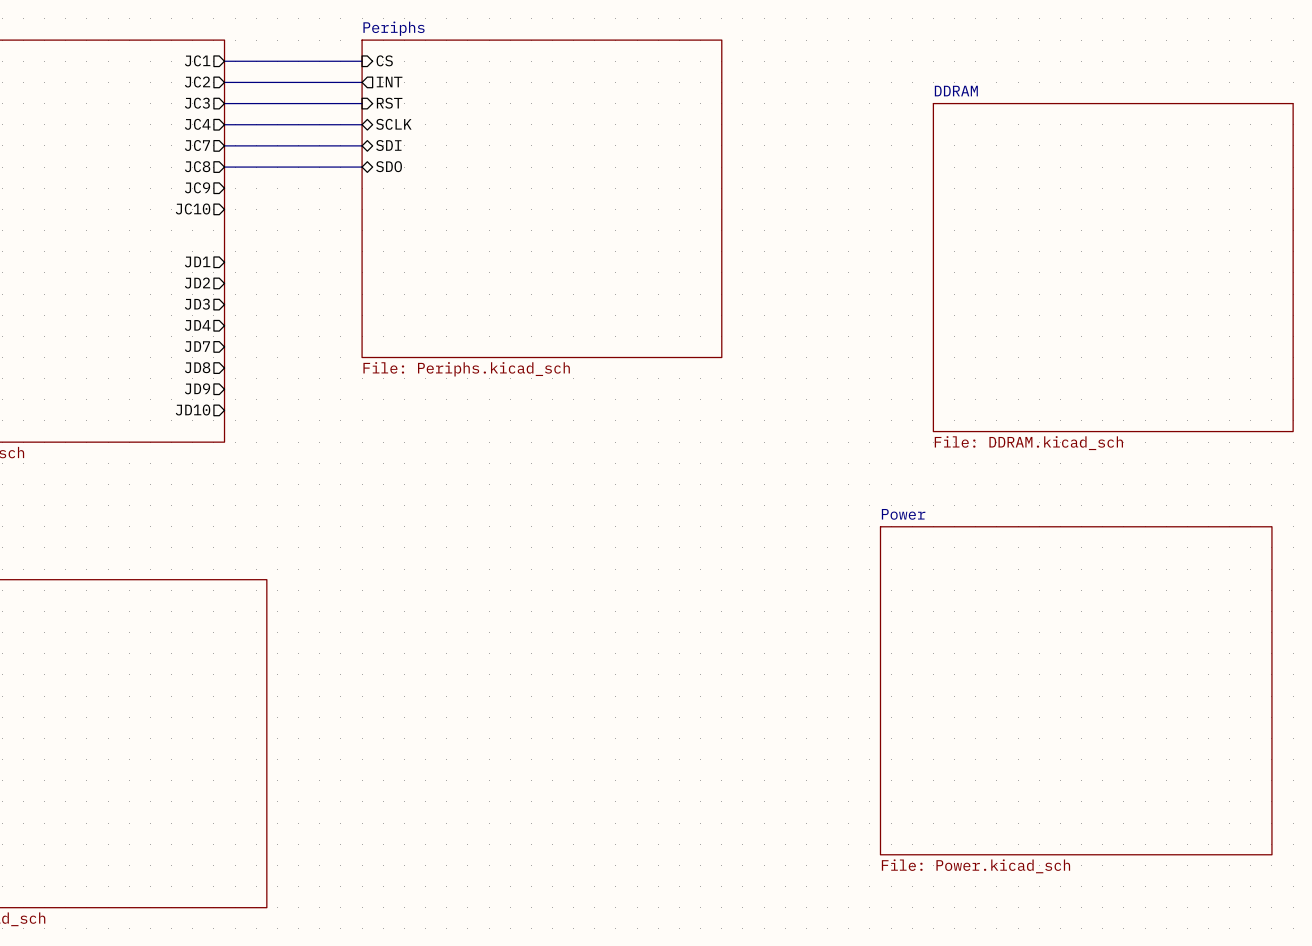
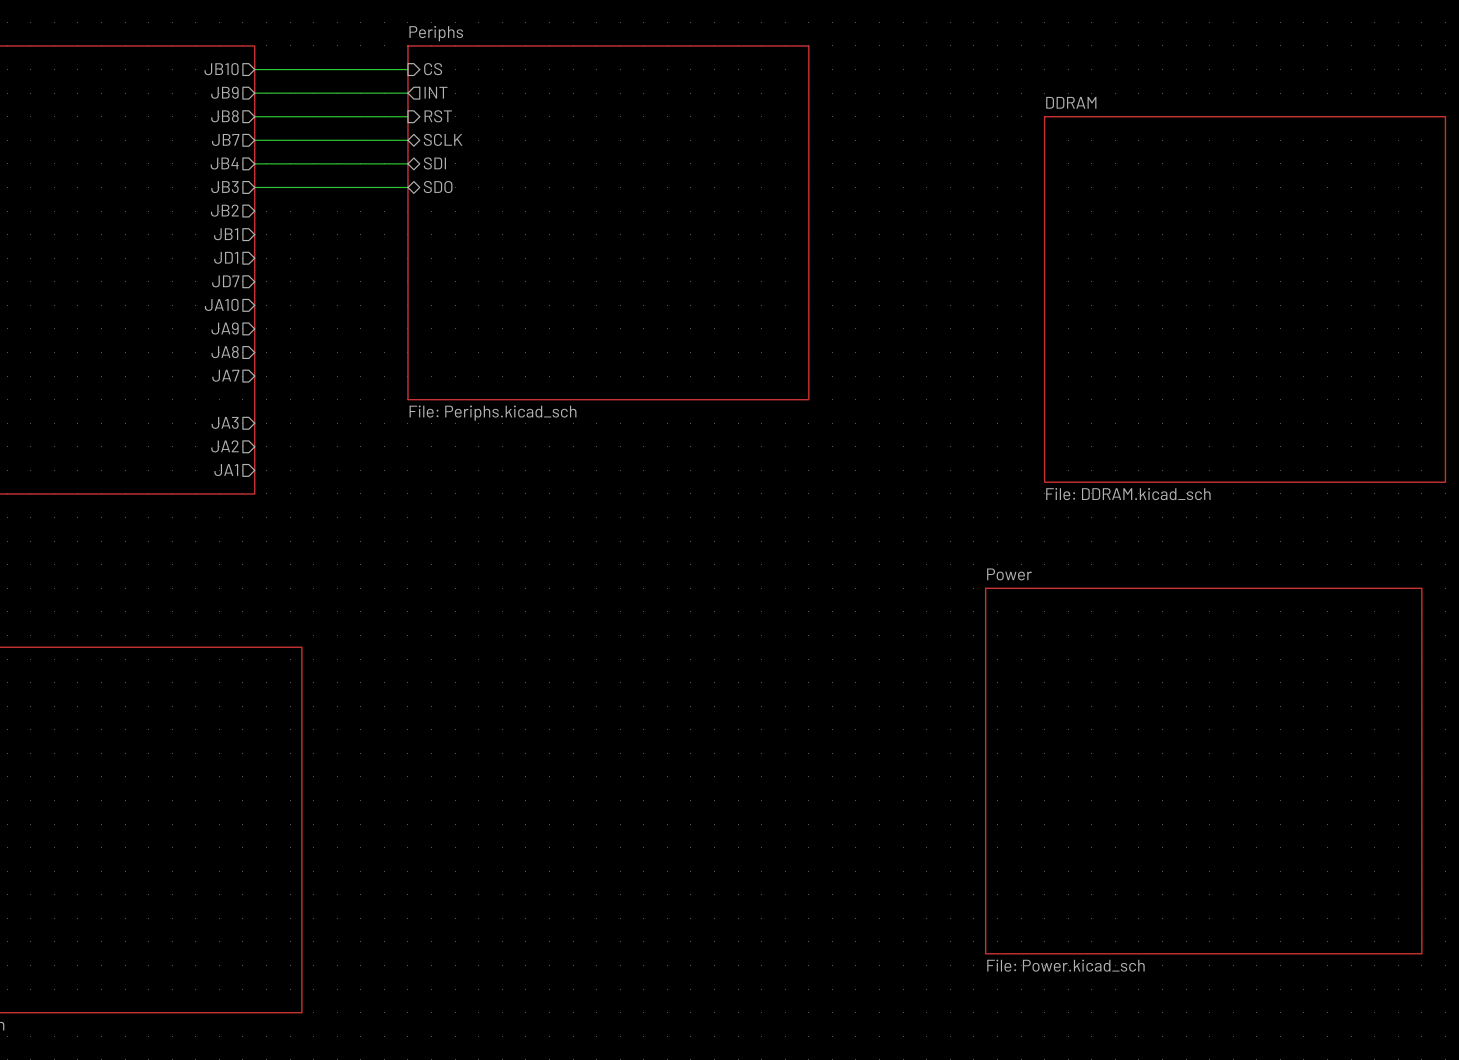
sheet pin: JC1 (197, 60) -> JB10 (221, 69)
sheet pin: JC2 (197, 82) -> JB9 (224, 92)
sheet pin: JC3 (197, 103) -> JB8 (224, 116)
sheet pin: JC4 (197, 124) -> JB7 (225, 139)
sheet pin: JC7 (197, 145) -> JB4 (224, 163)
sheet pin: JC8 (197, 166) -> JB3 (224, 187)
sheet pin: JC9 (197, 187) -> JB2 (224, 210)
sheet pin: JC10 (193, 208) -> JB1 (226, 234)
sheet pin position: JD1 (197, 261) -> JD1 (226, 257)
sheet pin: none -> JA10 (221, 304)
sheet pin: JD2 (197, 283) -> none
sheet pin: none -> JA9 (225, 328)
sheet pin: JD3 (197, 304) -> none
sheet pin: none -> JA8 (225, 352)
sheet pin: JD4 (197, 325) -> none
sheet pin: none -> JA7 (225, 375)
sheet pin position: JD7 (197, 346) -> JD7 (225, 281)
sheet pin: JD8 (197, 367) -> none
sheet pin: none -> JA3 (225, 422)
sheet pin: JD9 (197, 388) -> none
sheet pin: none -> JA2 (225, 446)
sheet pin: JD10 (193, 410) -> none
sheet pin: none -> JA1 (226, 470)

